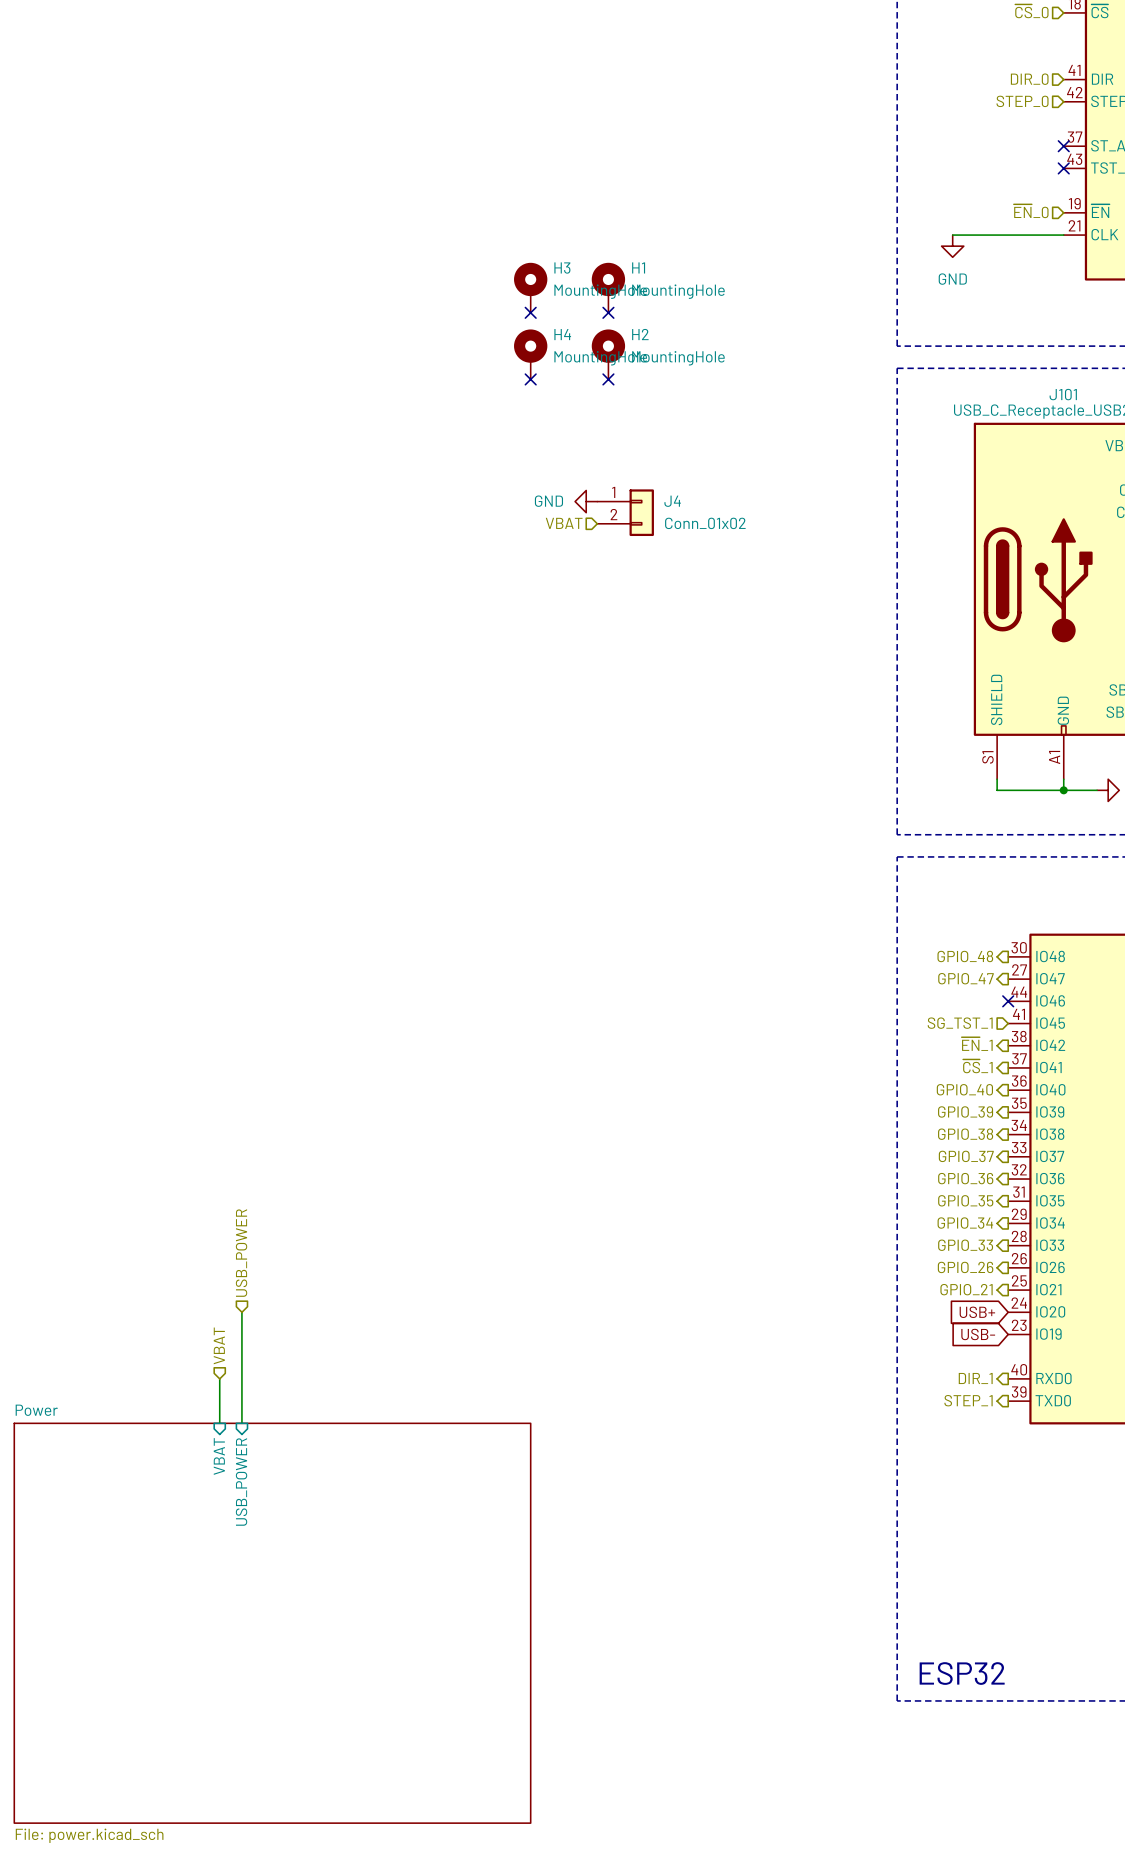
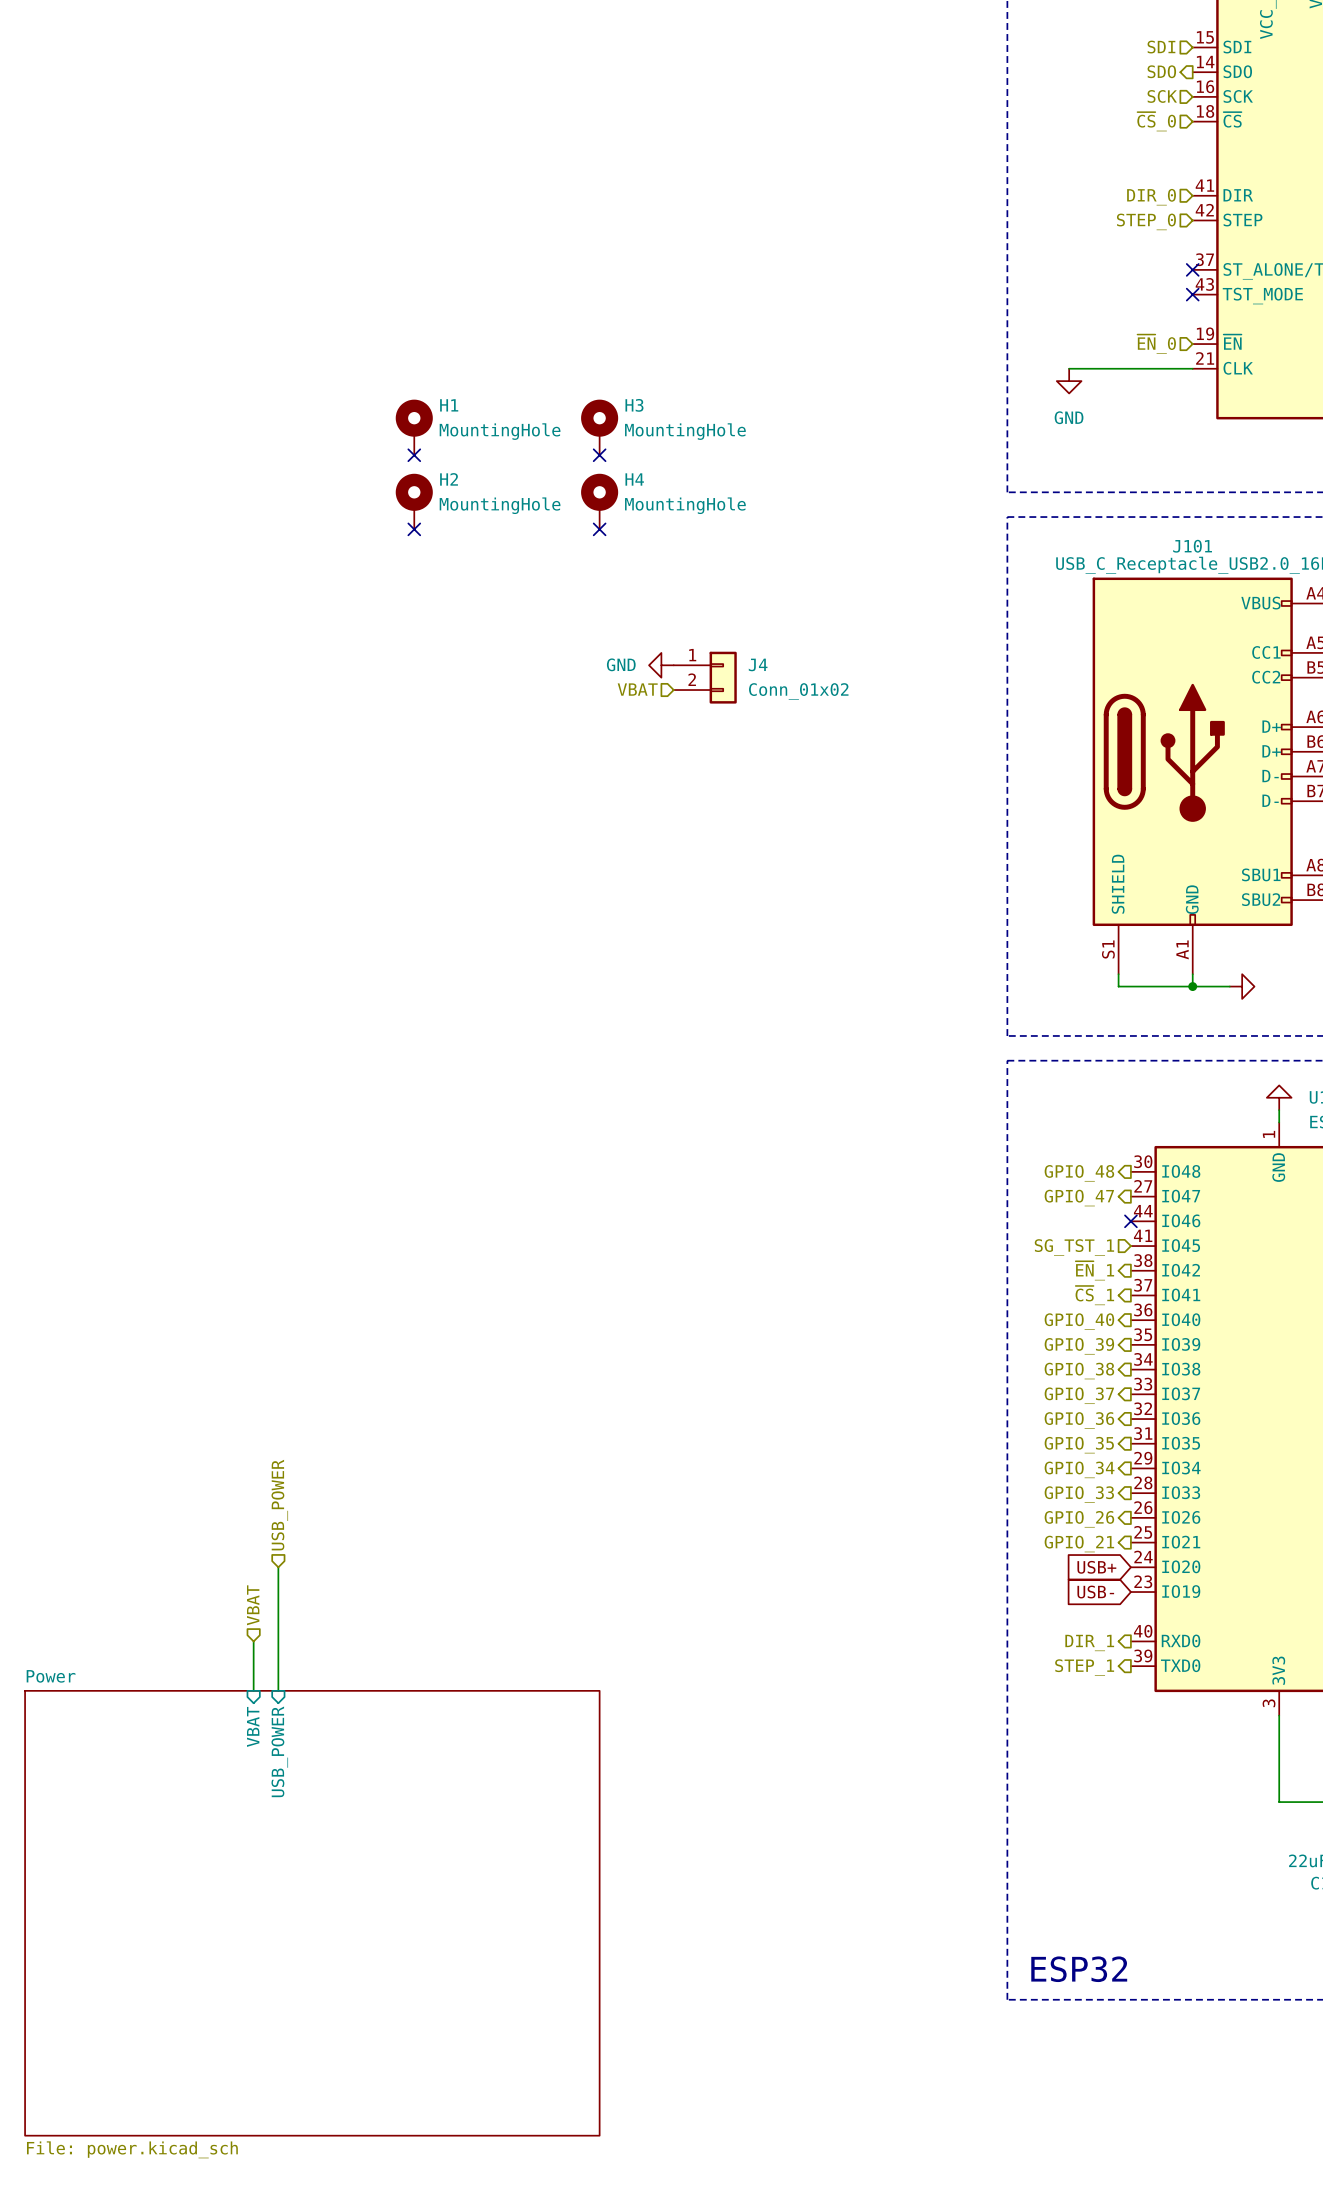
H1 position: (608, 287) -> (414, 427)
no-connect mark: none -> (414, 455)
no-connect mark: (608, 312) -> none
H2 position: (608, 354) -> (414, 501)
no-connect mark: none -> (414, 529)
no-connect mark: (608, 379) -> none

